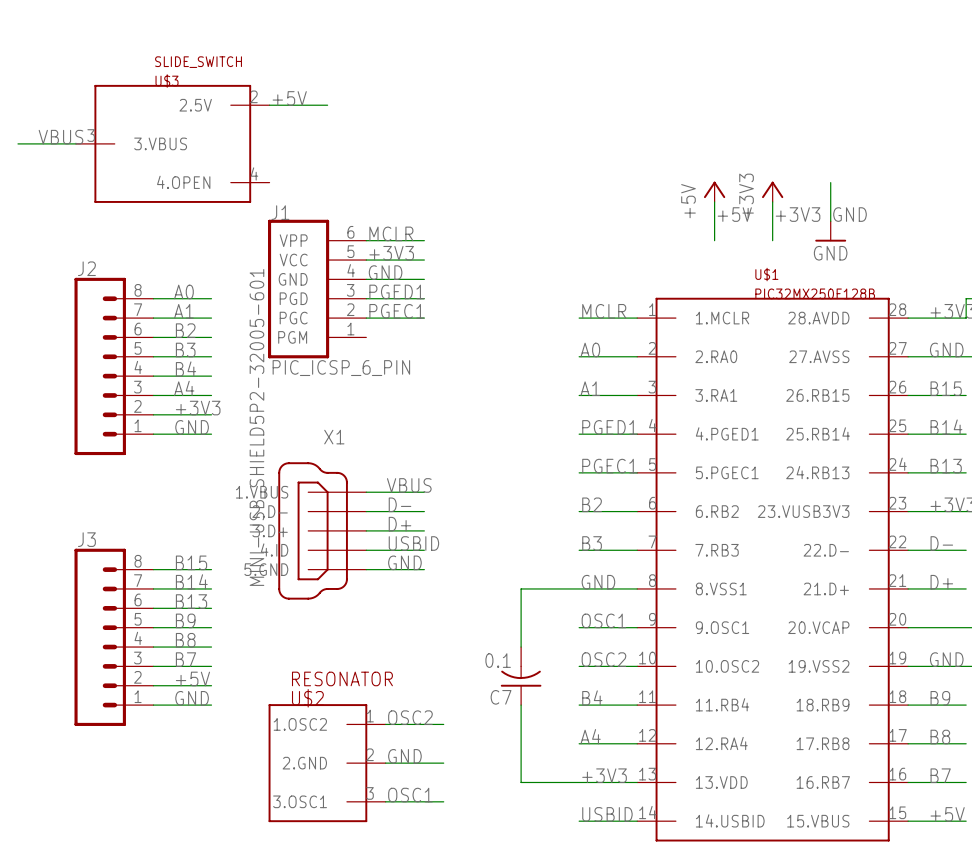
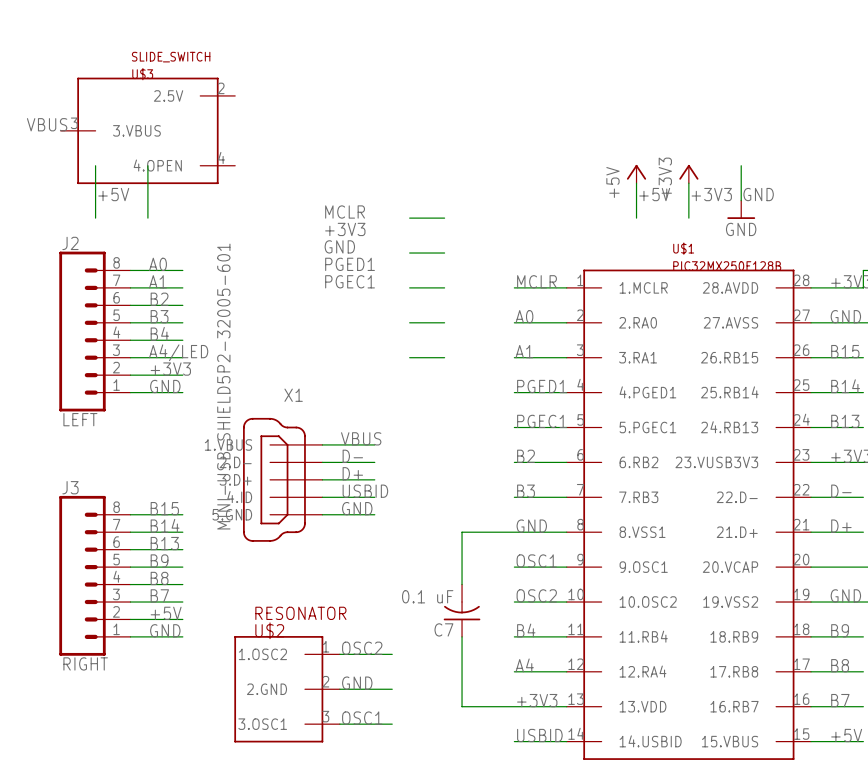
label: +5V (289, 98) -> none
wire: (269, 105) (327, 105) -> none
wire: (17, 143) (76, 143) -> none
wire: none -> (95, 165) (95, 218)
wire: none -> (147, 165) (147, 218)
label: none -> +5V (113, 194)
wire: (366, 240) (424, 240) -> none
wire: none -> (409, 218) (444, 218)
wire: (366, 260) (424, 260) -> none
wire: (366, 279) (424, 279) -> none
wire: none -> (409, 253) (444, 253)
J1: PIC_ICSP_6_PIN (317, 289) -> none
wire: (366, 298) (424, 298) -> none
wire: (366, 318) (424, 318) -> none
wire: none -> (409, 287) (444, 287)
wire: none -> (409, 322) (444, 322)
label: A4 (184, 388) -> A4/LED (178, 352)
wire: none -> (409, 357) (444, 357)
J2 value: none -> LEFT (80, 419)
C7 value: 0.1 (498, 660) -> 0.1 uF (427, 596)
J3 value: none -> RIGHT (85, 663)

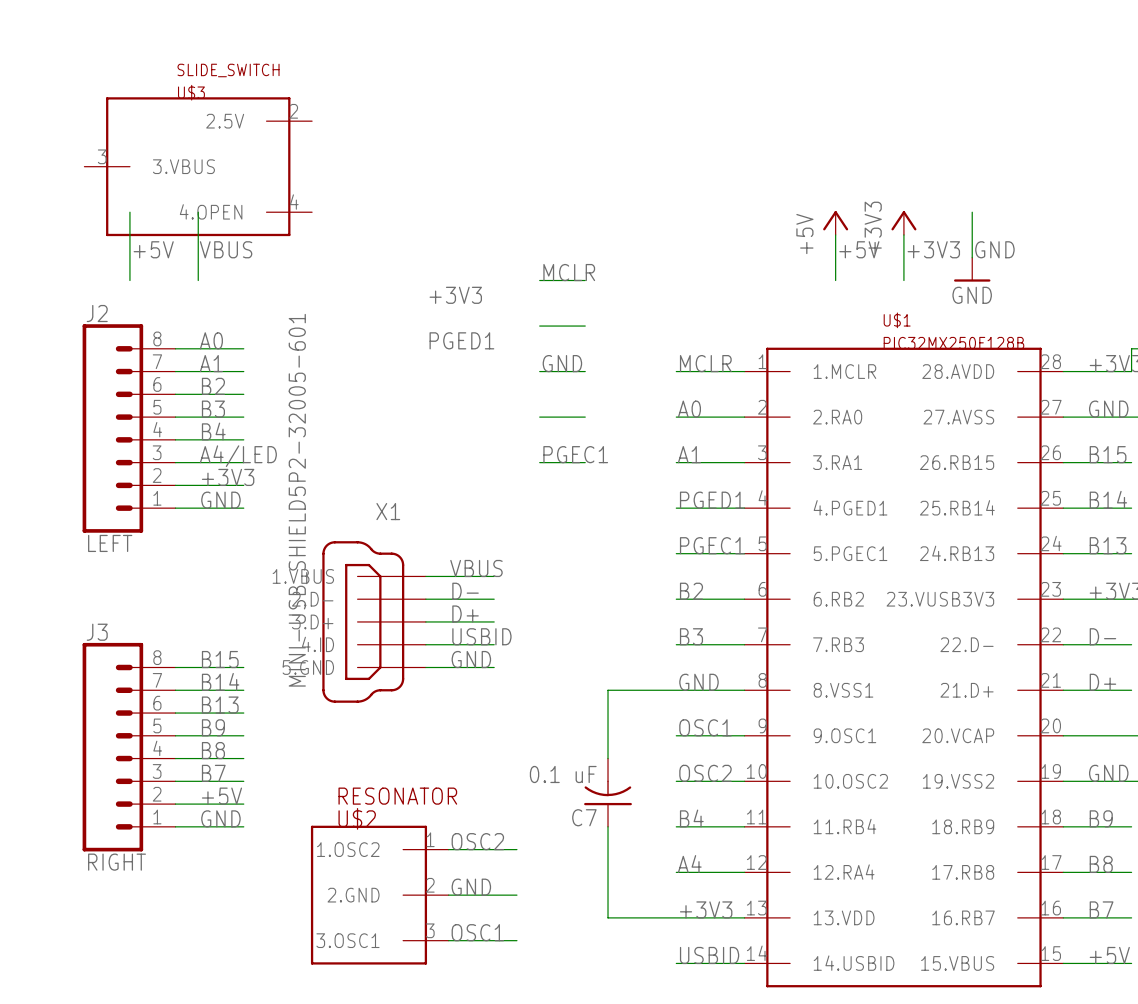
label position: VBUS (47, 124) -> VBUS (226, 249)
label position: MCLR (345, 212) -> MCLR (569, 272)
label position: GND (339, 246) -> GND (562, 363)
label position: PGEC1 (350, 281) -> PGEC1 (575, 454)

